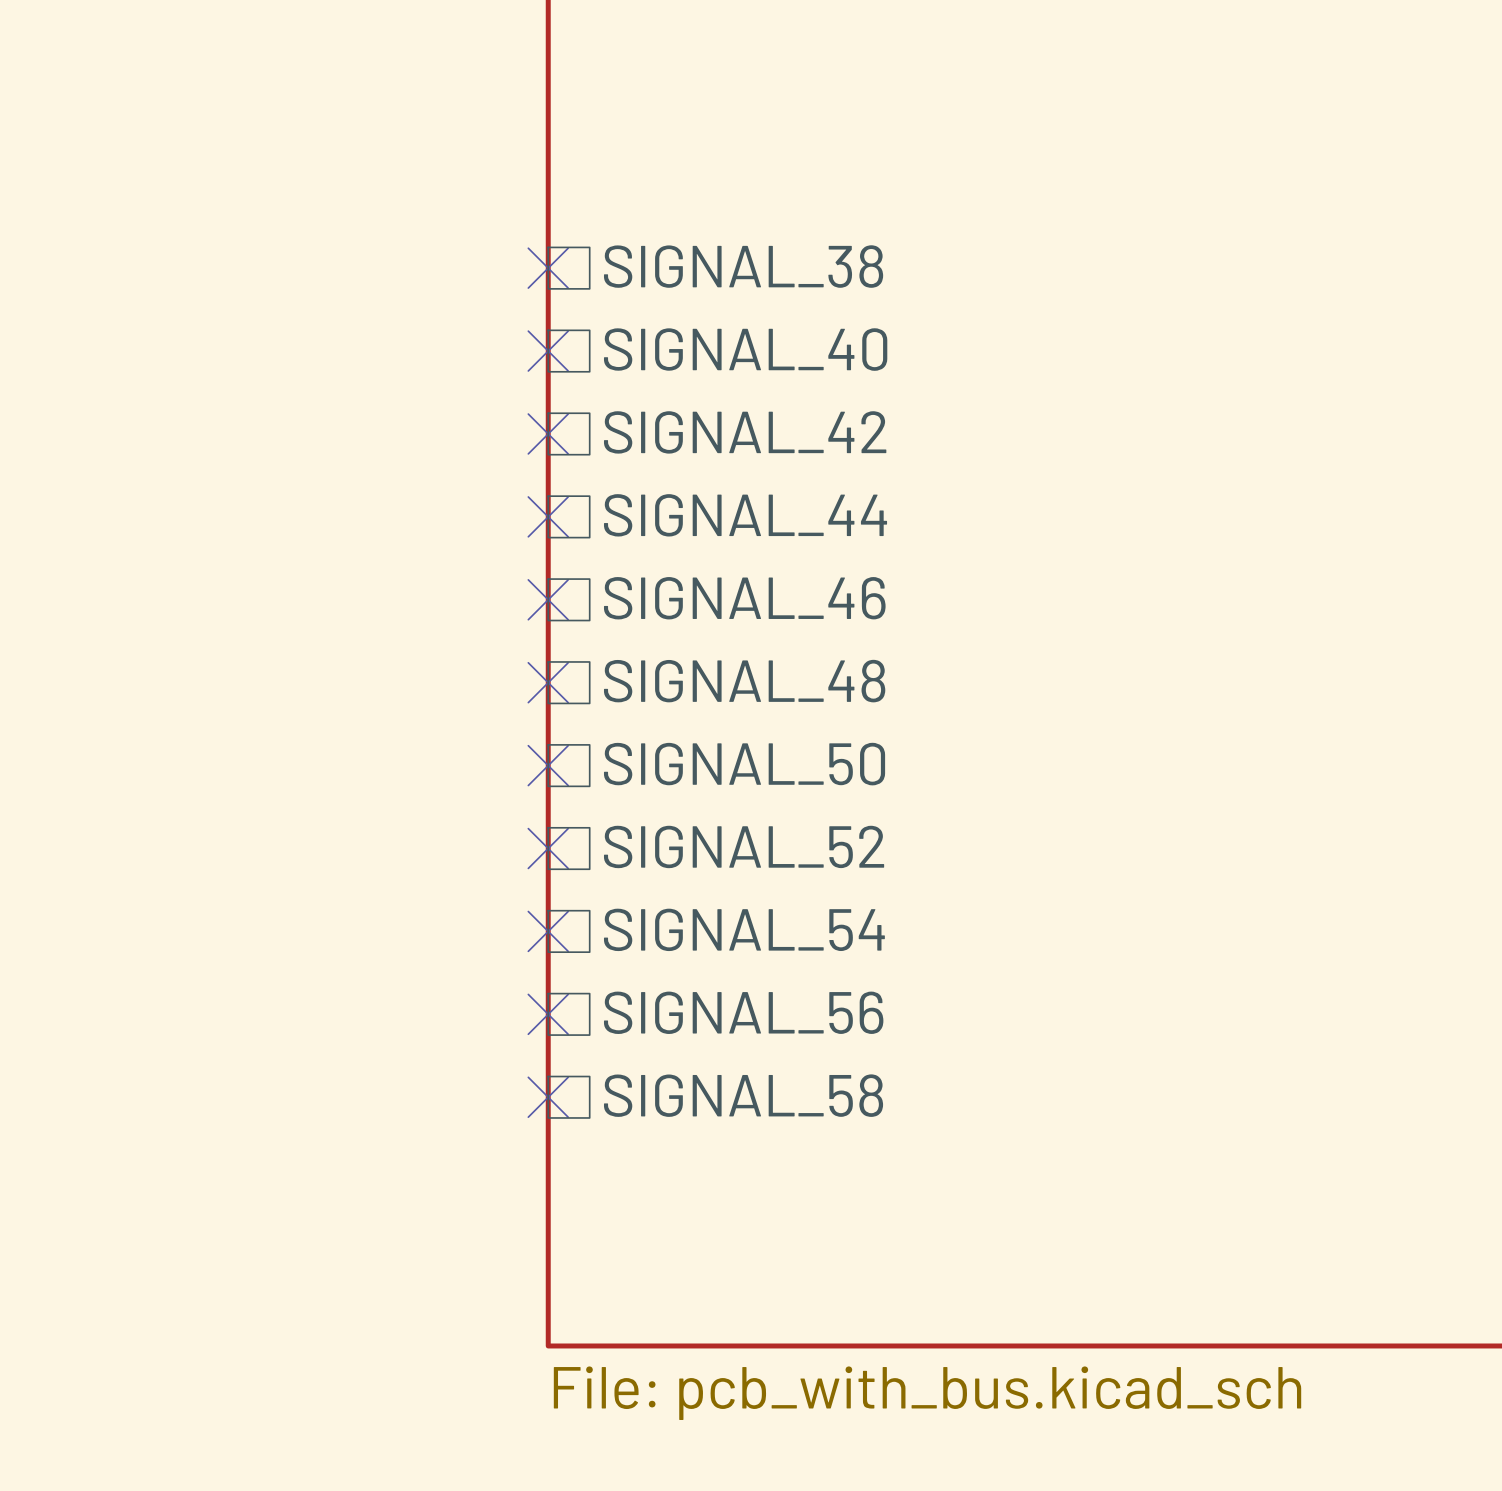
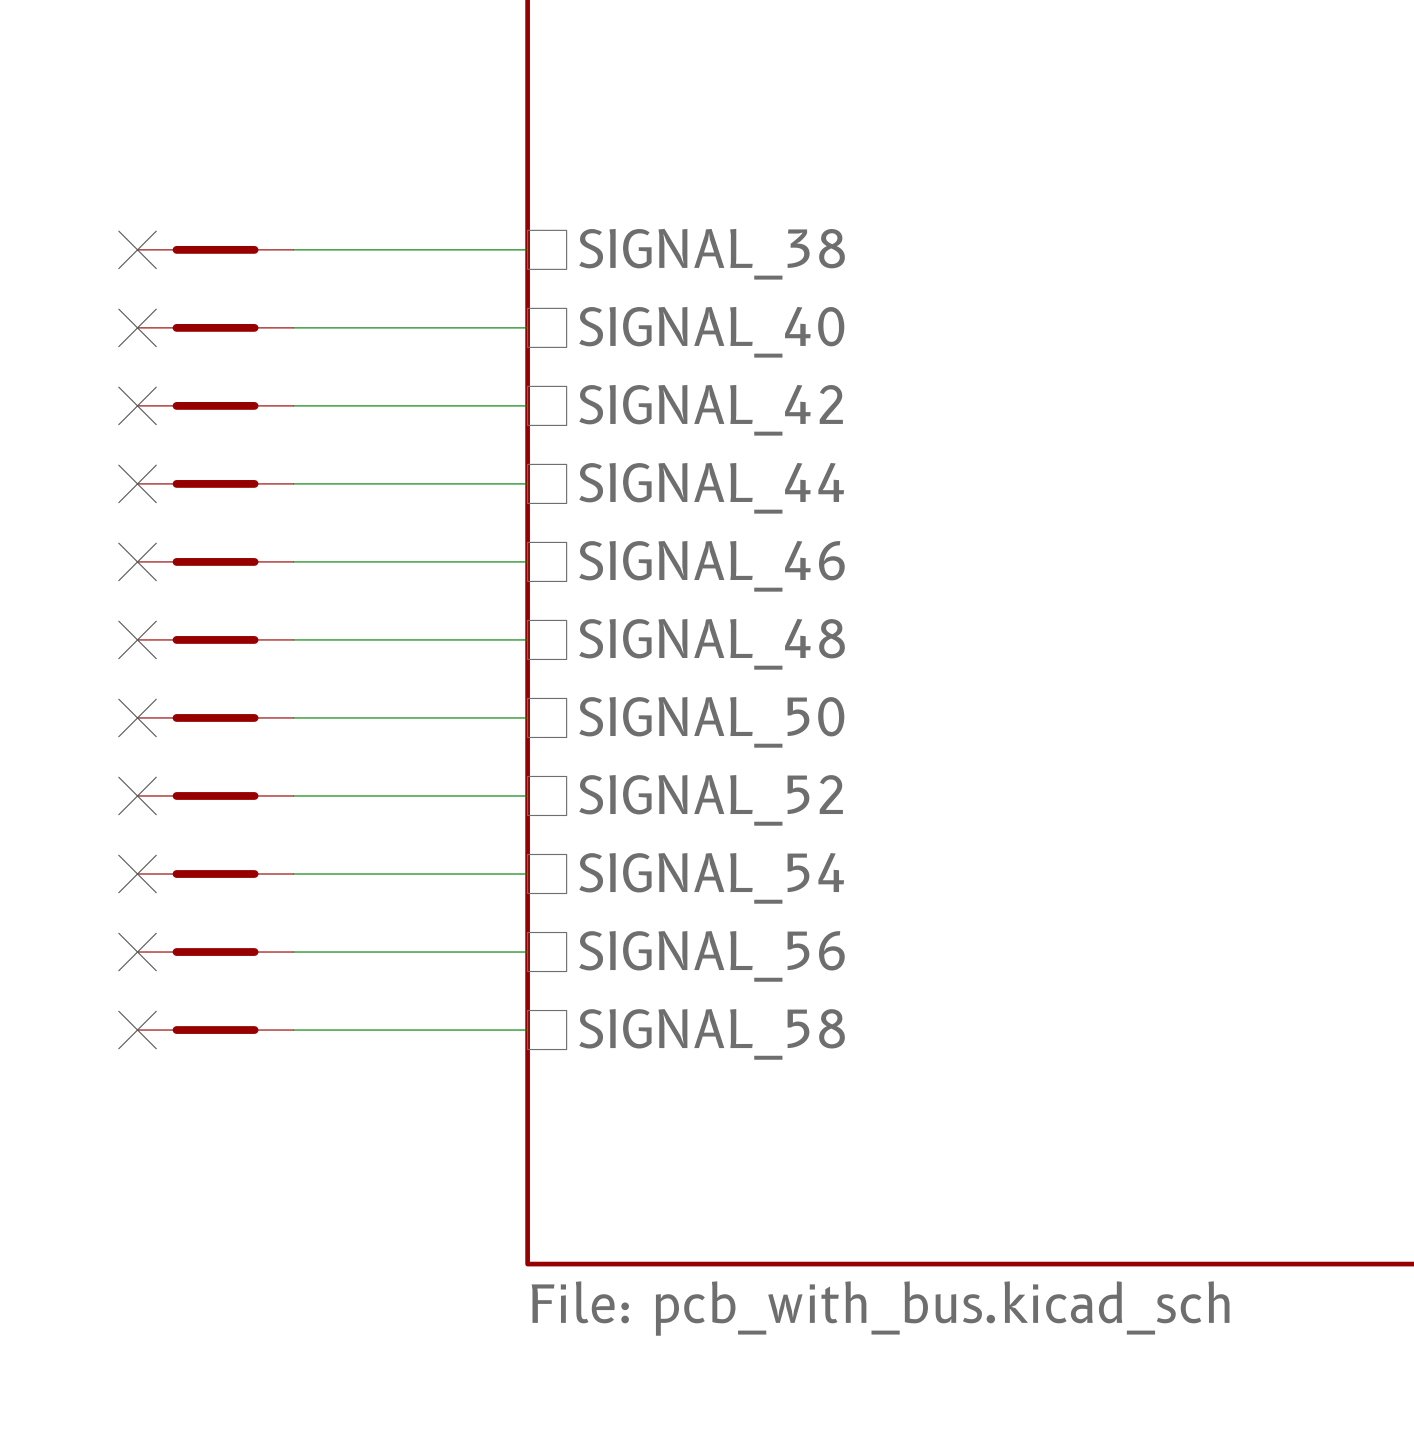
no-connect mark: none -> (137, 249)
part: none -> (215, 249)
wire: none -> (293, 249) (527, 249)
no-connect mark: (548, 268) -> none
no-connect mark: none -> (137, 327)
part: none -> (215, 327)
wire: none -> (293, 327) (527, 327)
no-connect mark: (548, 351) -> none
no-connect mark: none -> (137, 405)
part: none -> (215, 405)
wire: none -> (293, 405) (527, 405)
no-connect mark: (548, 433) -> none
no-connect mark: none -> (137, 483)
part: none -> (215, 483)
wire: none -> (293, 483) (527, 483)
no-connect mark: (548, 516) -> none
no-connect mark: none -> (137, 561)
part: none -> (215, 561)
wire: none -> (293, 561) (527, 561)
no-connect mark: (548, 599) -> none
no-connect mark: none -> (137, 639)
part: none -> (215, 639)
wire: none -> (293, 639) (527, 639)
no-connect mark: (548, 682) -> none
no-connect mark: none -> (137, 717)
part: none -> (215, 717)
wire: none -> (293, 717) (527, 717)
no-connect mark: (548, 765) -> none
no-connect mark: none -> (137, 795)
part: none -> (215, 795)
wire: none -> (293, 795) (527, 795)
no-connect mark: (548, 848) -> none
no-connect mark: none -> (137, 873)
part: none -> (215, 873)
wire: none -> (293, 873) (527, 873)
no-connect mark: (548, 931) -> none
no-connect mark: none -> (137, 952)
part: none -> (215, 952)
wire: none -> (293, 952) (527, 952)
no-connect mark: (548, 1014) -> none
no-connect mark: none -> (137, 1030)
part: none -> (215, 1030)
wire: none -> (293, 1030) (527, 1030)
no-connect mark: (548, 1097) -> none

